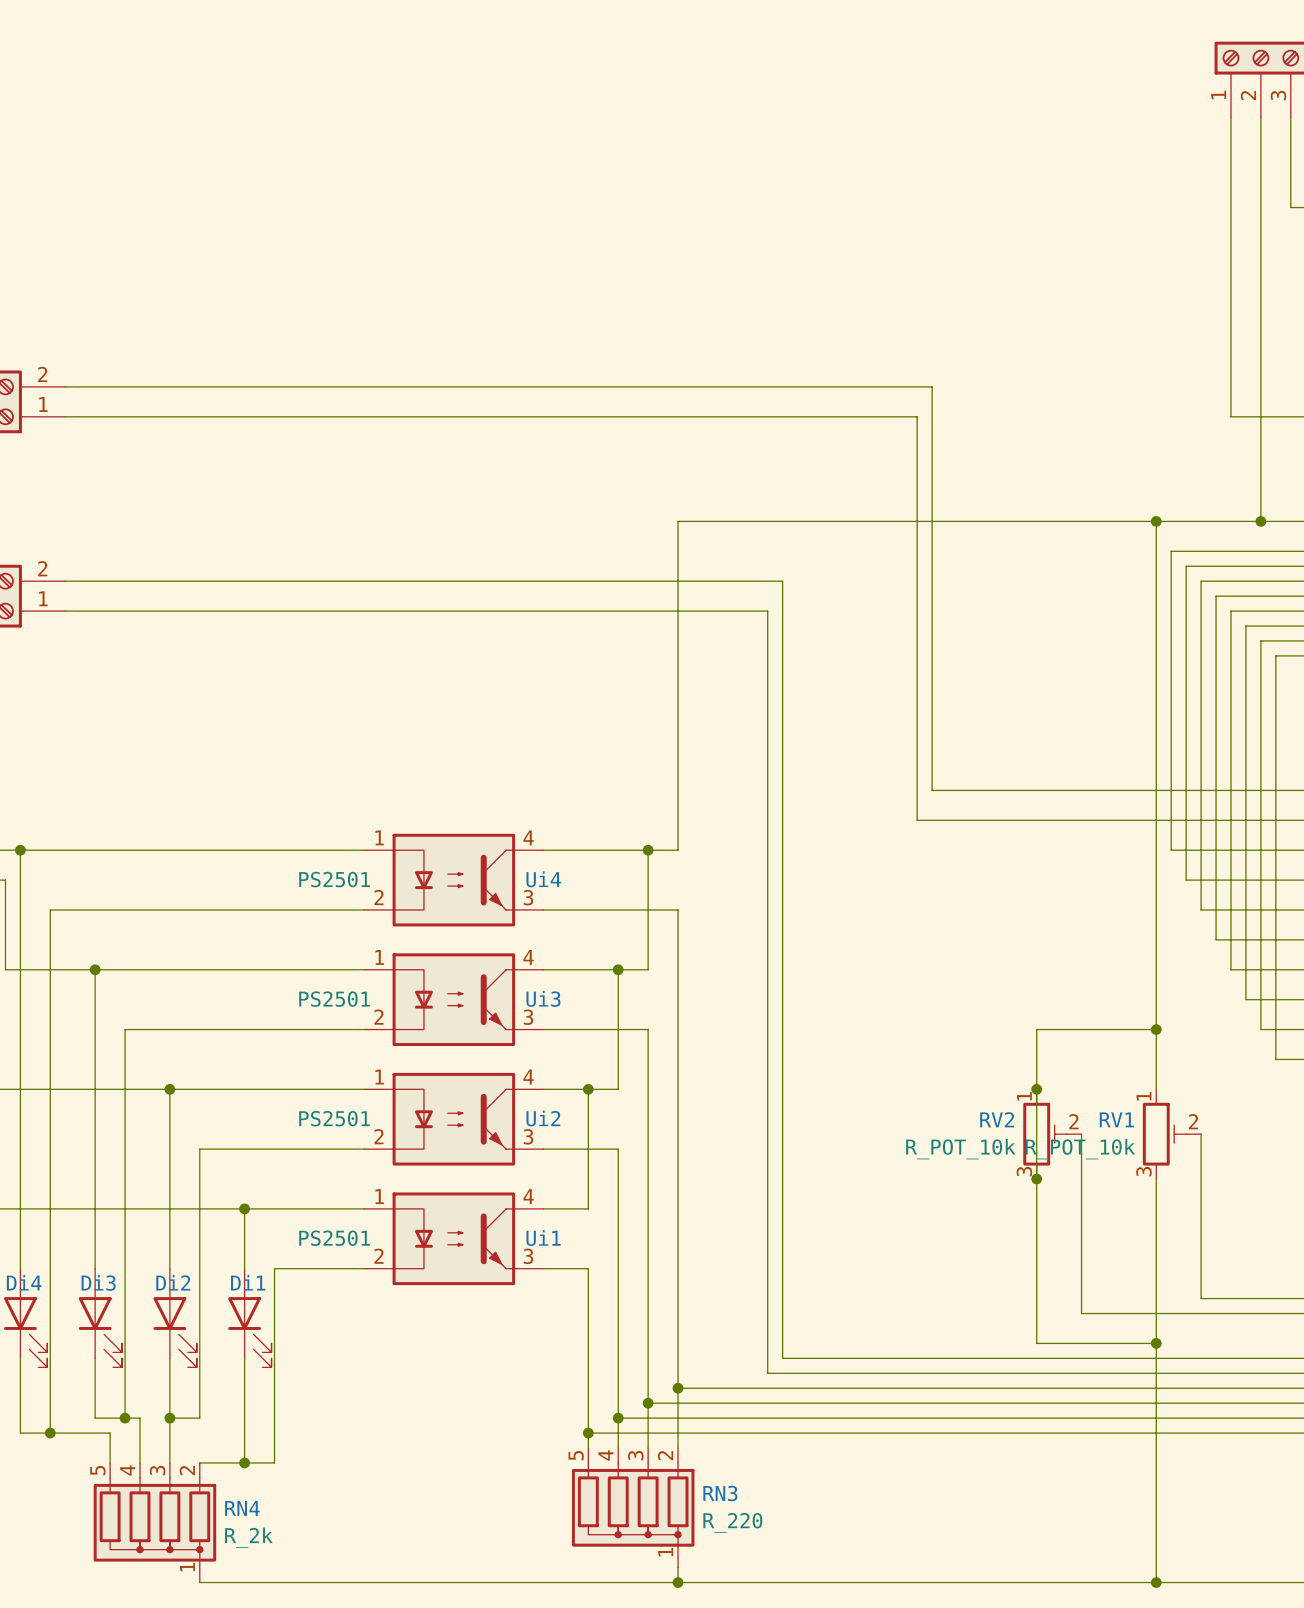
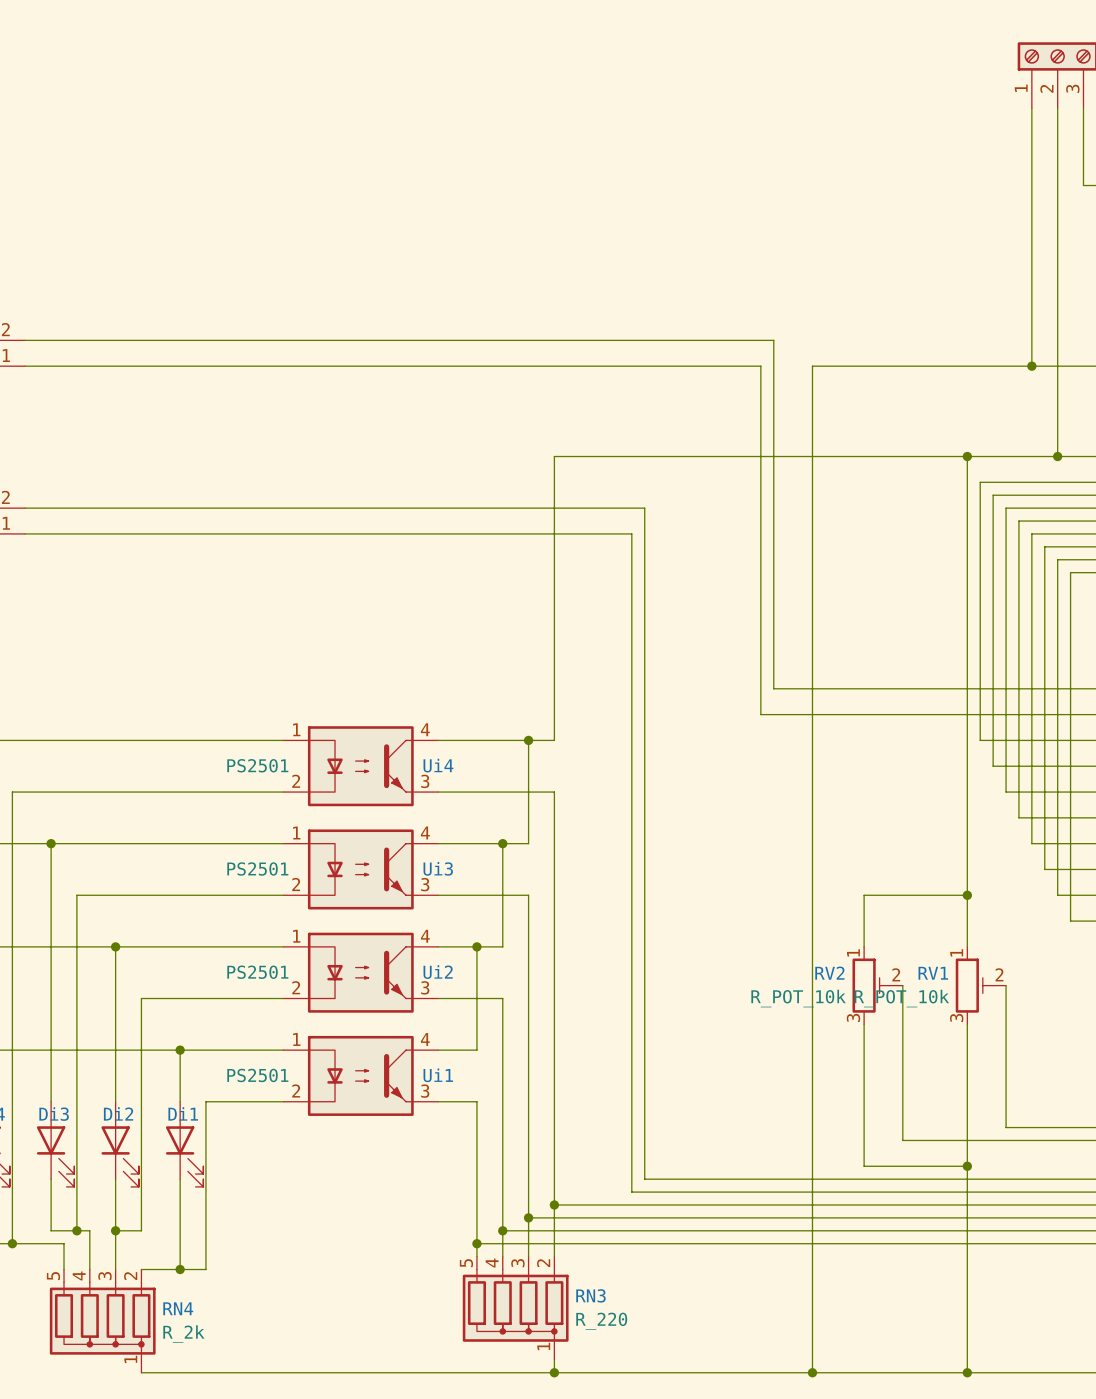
wire: none -> (1031, 366) (812, 366) (812, 1372)
junction: none -> (1031, 366)
wire: (1036, 1089) (1036, 1179) -> none
junction: (1036, 1089) -> none
junction: (1036, 1179) -> none
junction: none -> (812, 1372)

